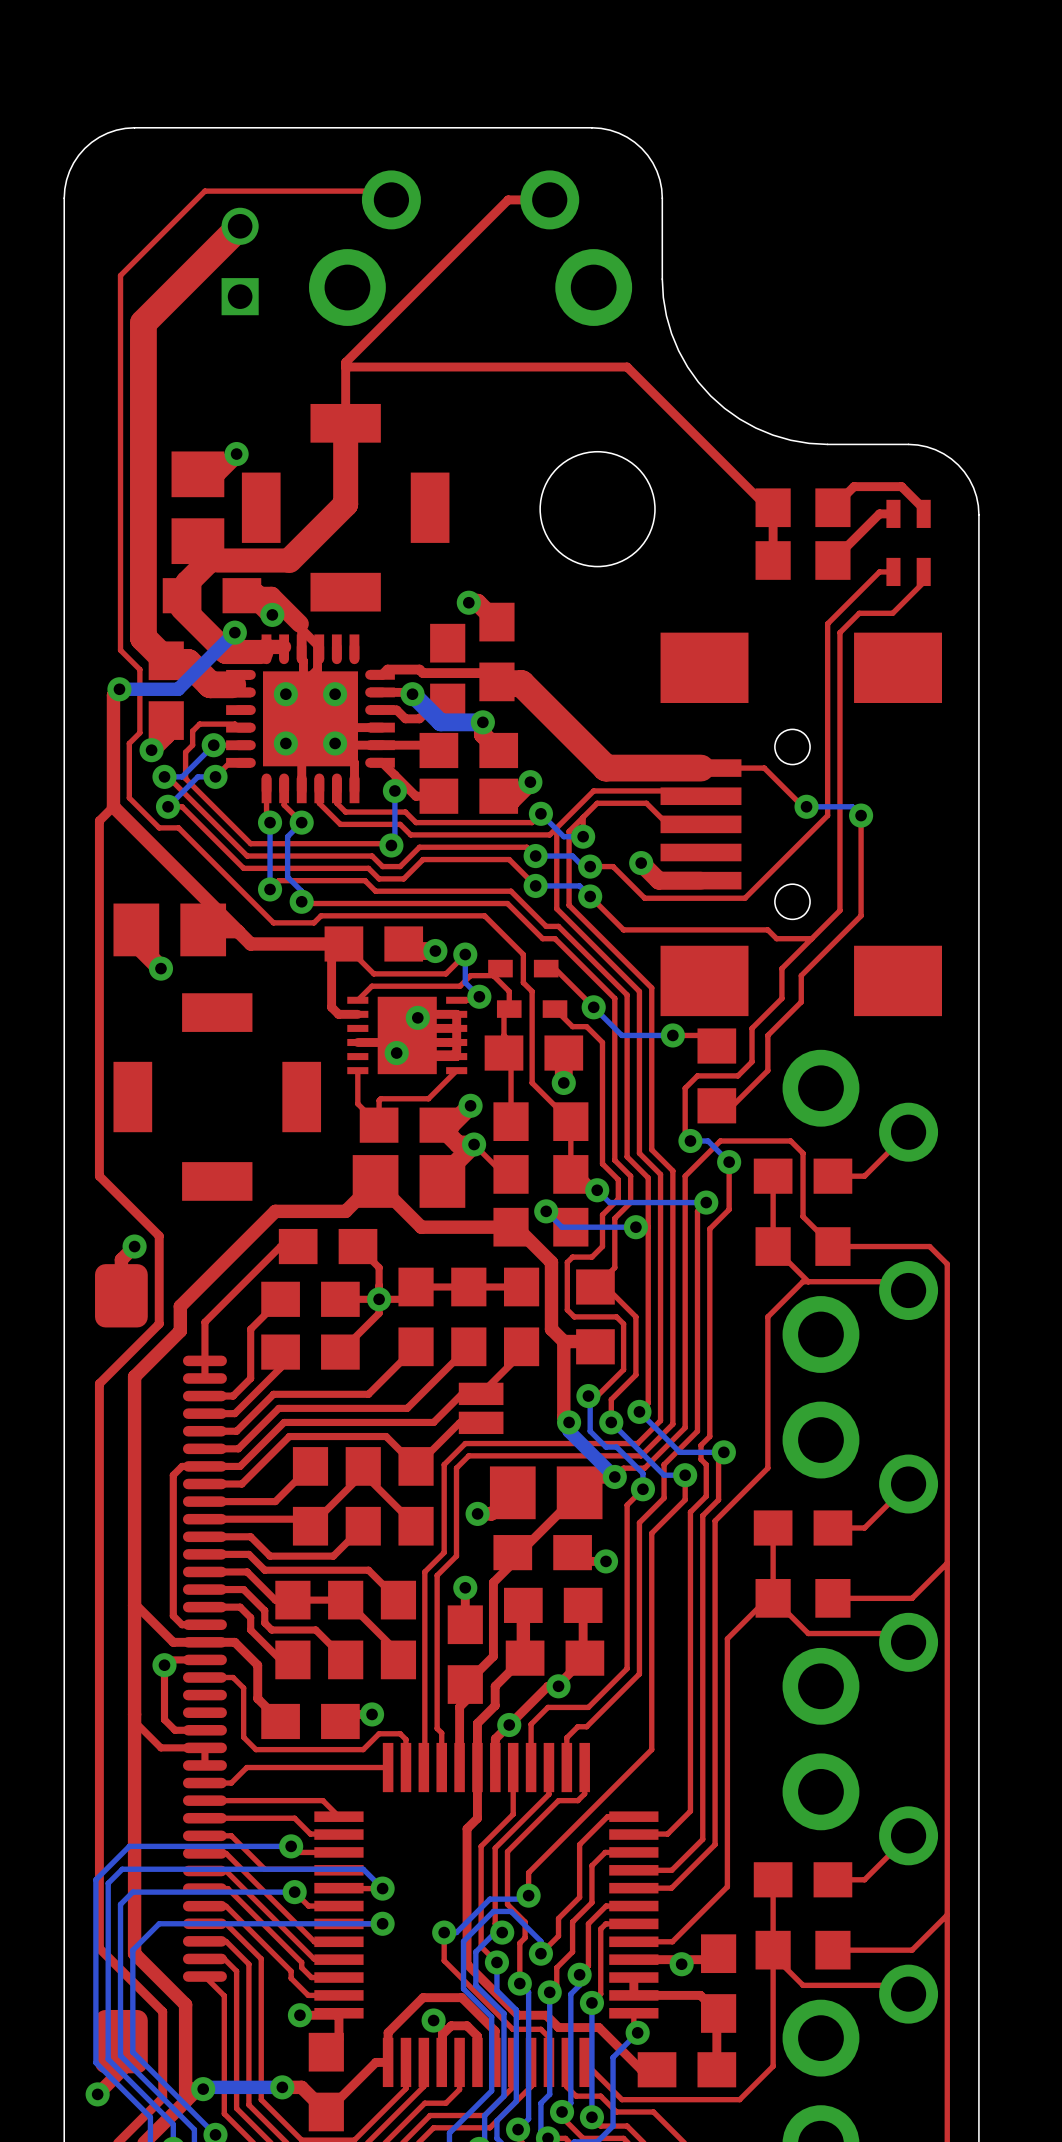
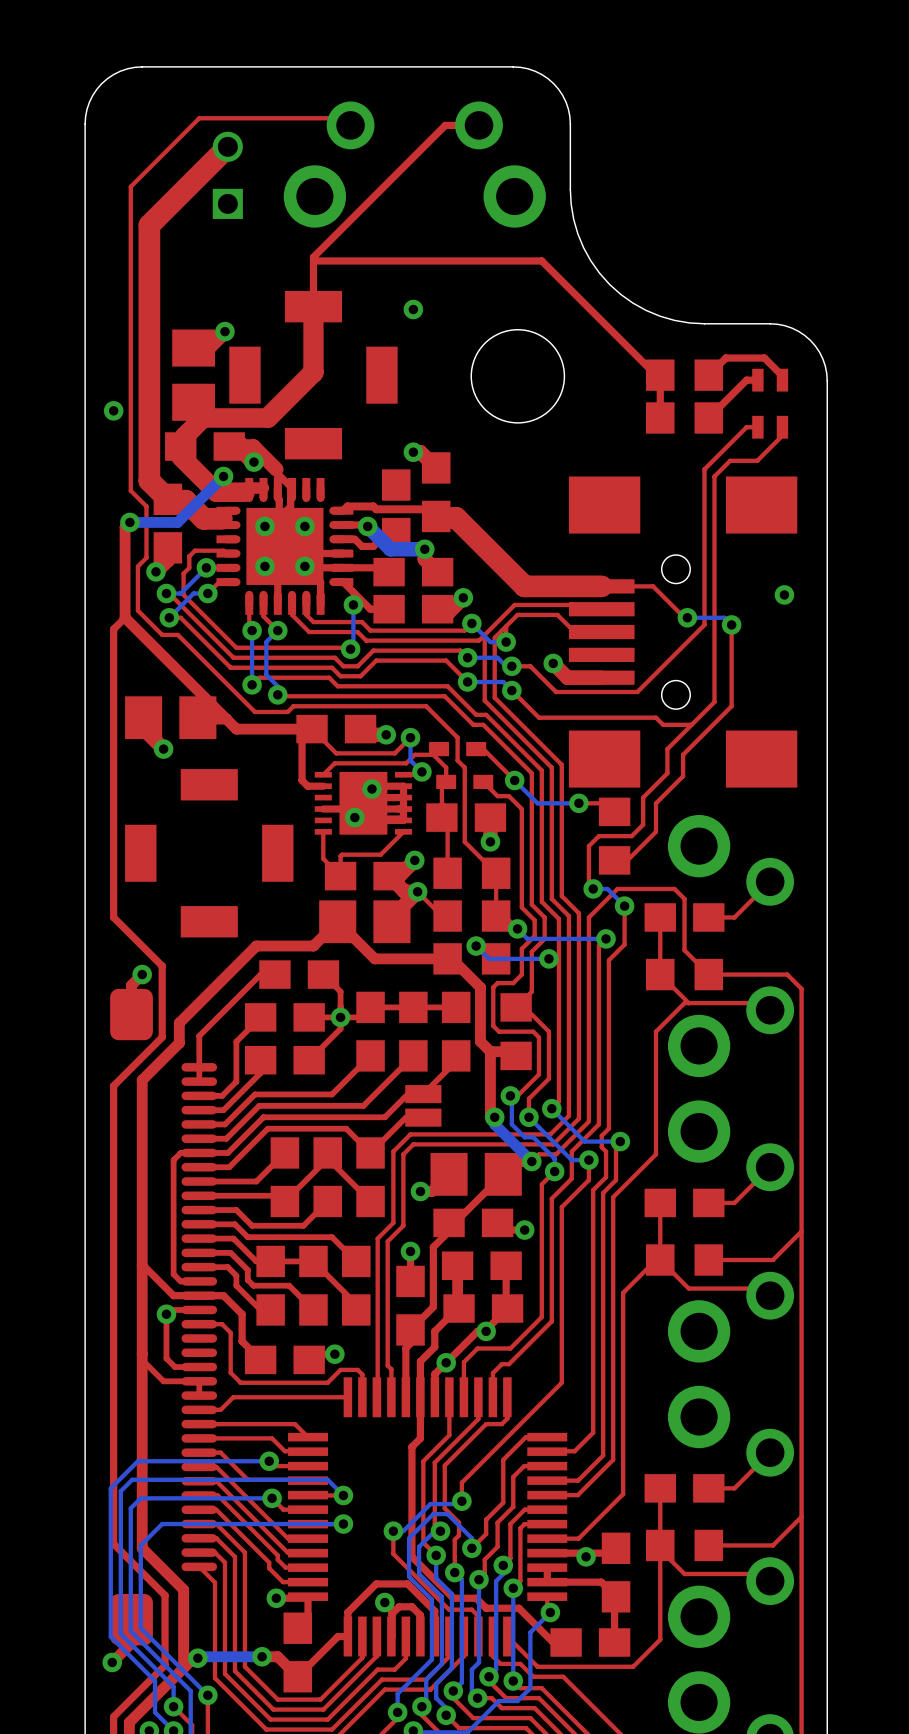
via: none -> (413, 309)
via: none -> (113, 410)
via: none -> (784, 594)

